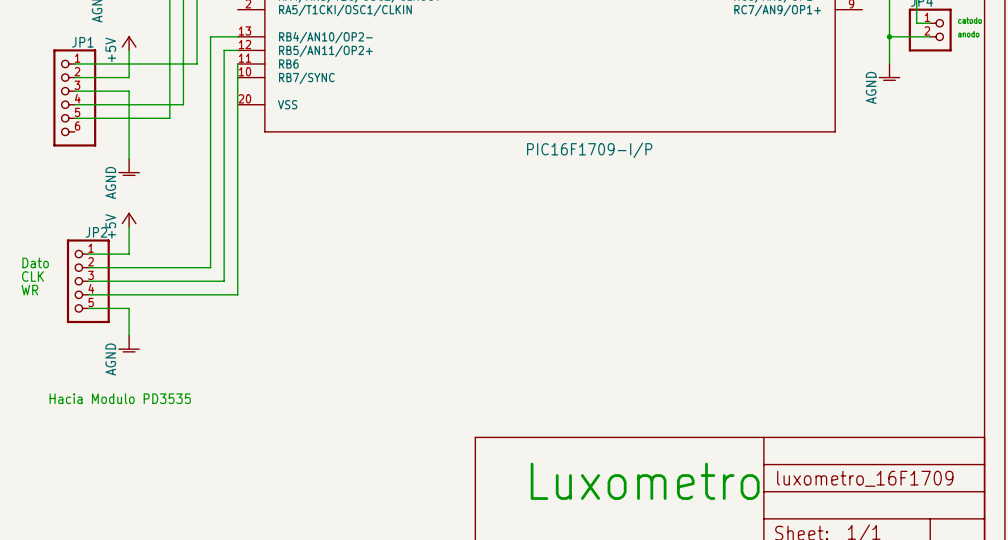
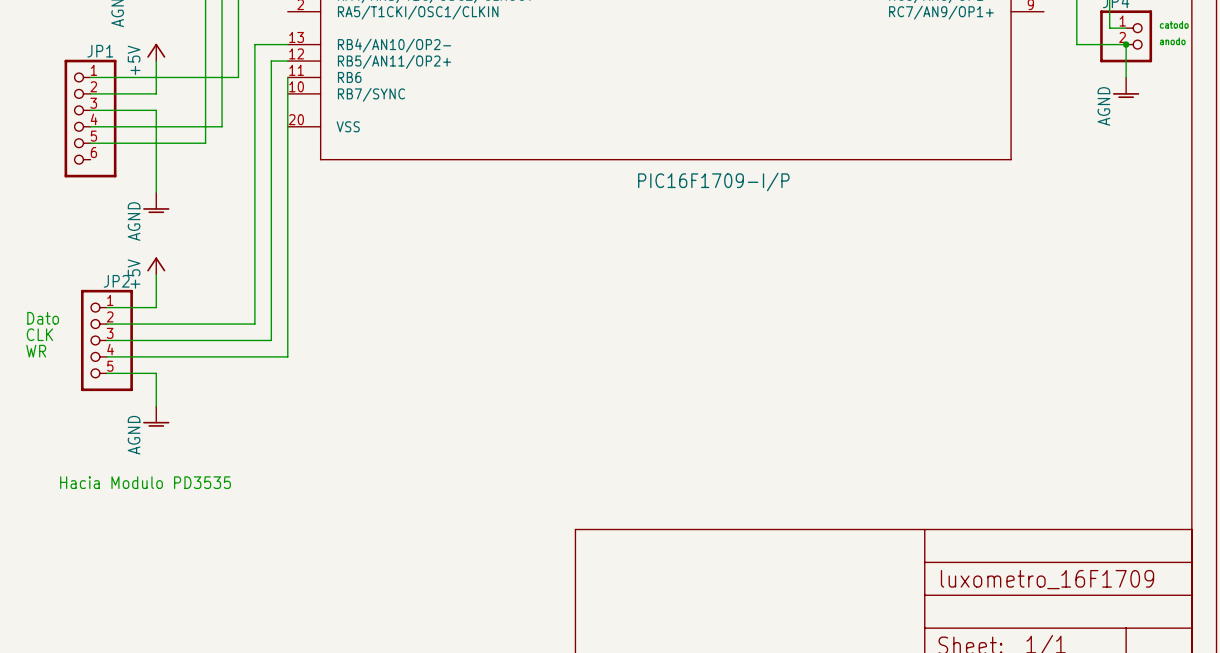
wire: (889, 36) (889, 63) -> (1126, 44) (1126, 77)
junction: (889, 36) -> none
junction: none -> (1126, 44)
power symbol position: AGND (889, 72) -> AGND (1126, 87)
text: Luxometro (645, 481) -> none

